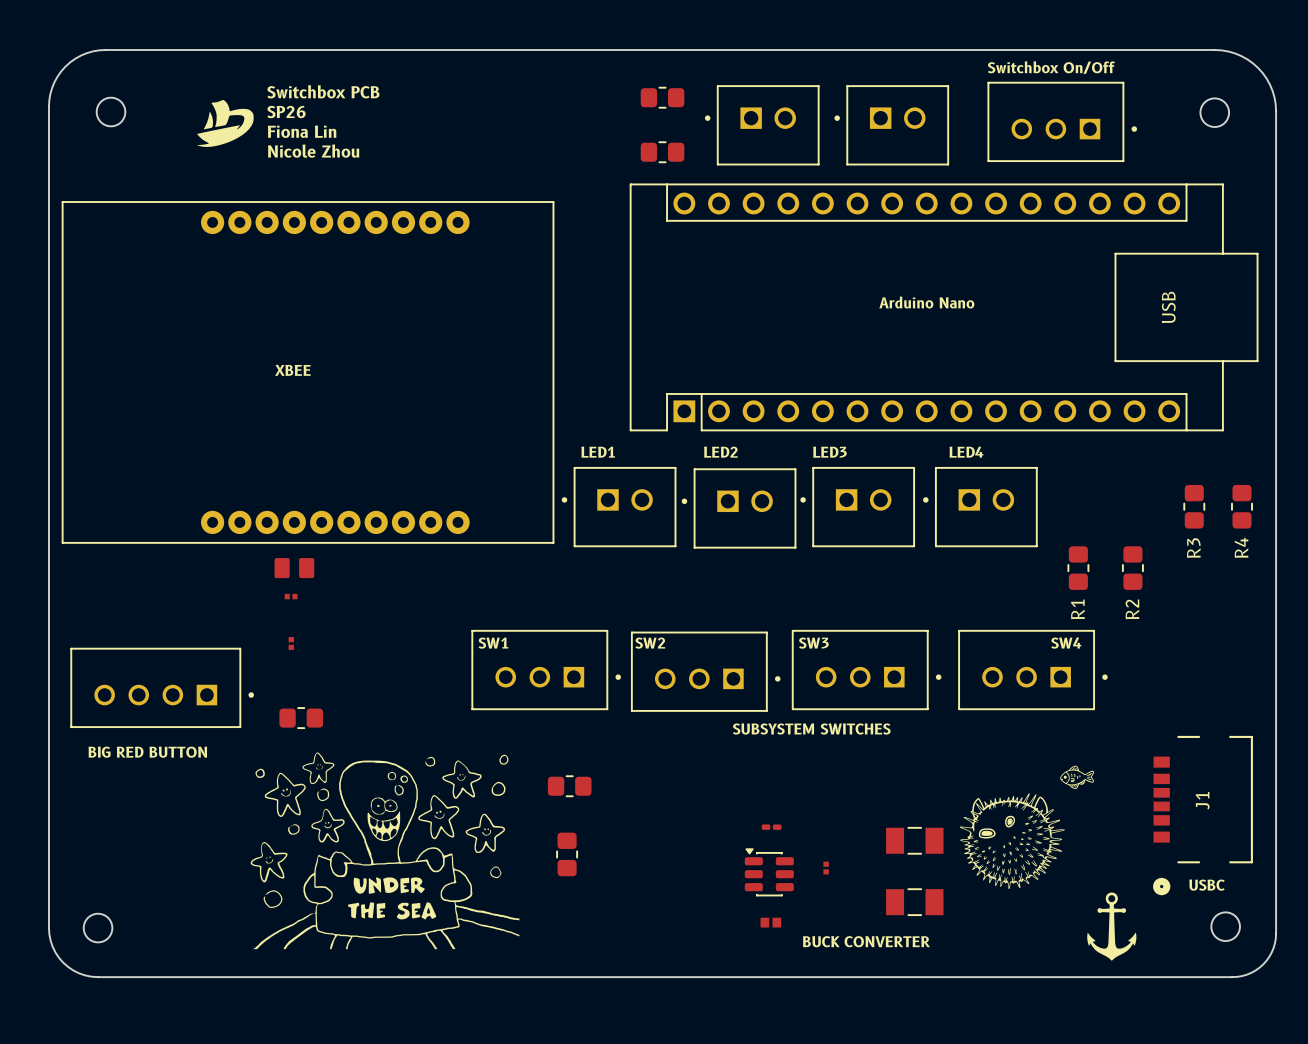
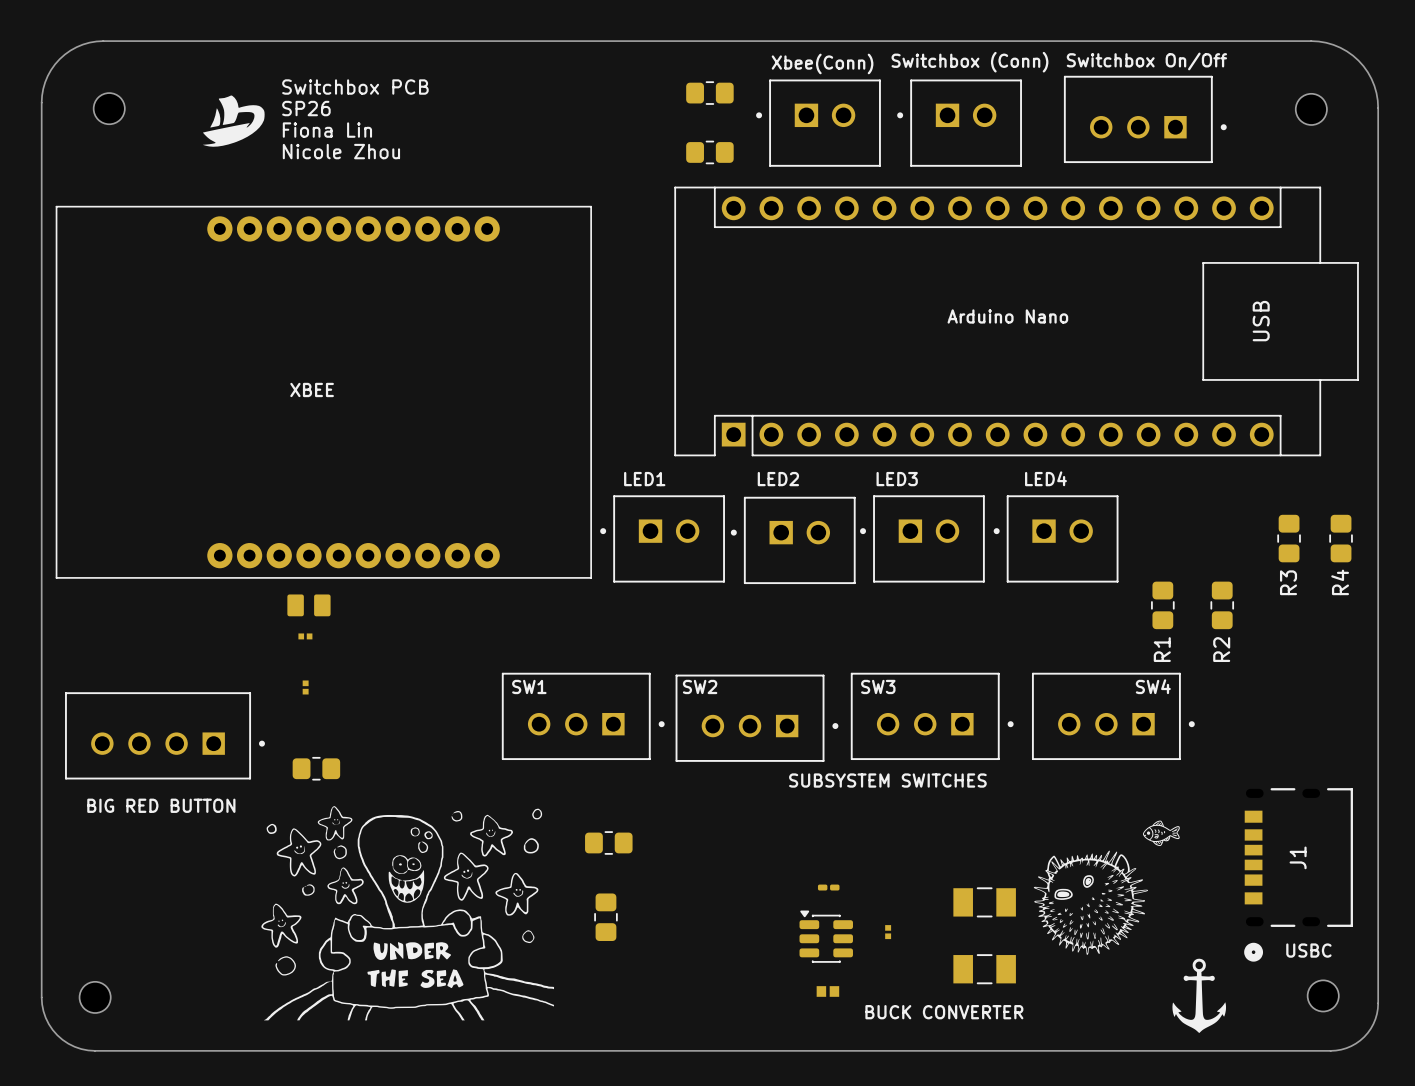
text: none -> Switchbox (Conn) (969, 62)
text: none -> Xbee(Conn) (822, 63)

